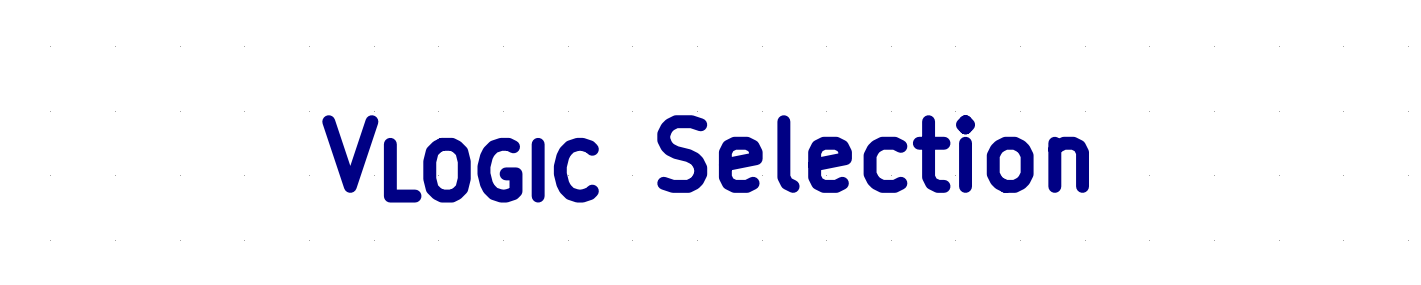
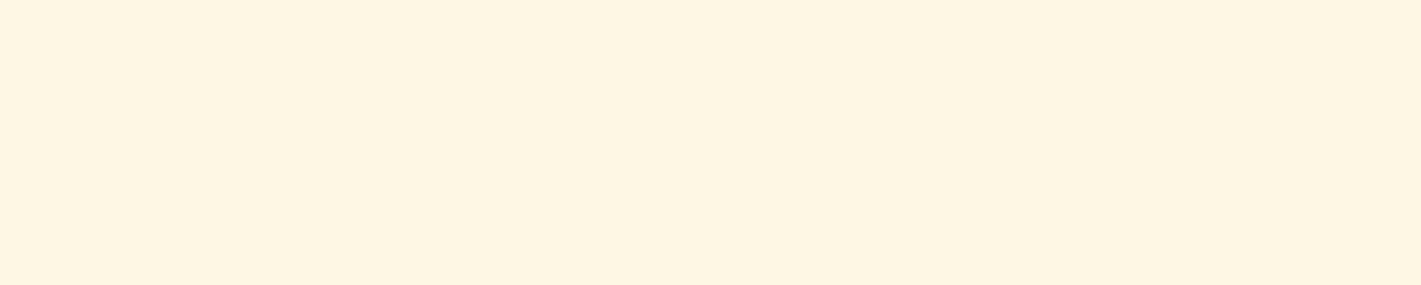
text: VLOGIC Selection (705, 158) -> none

